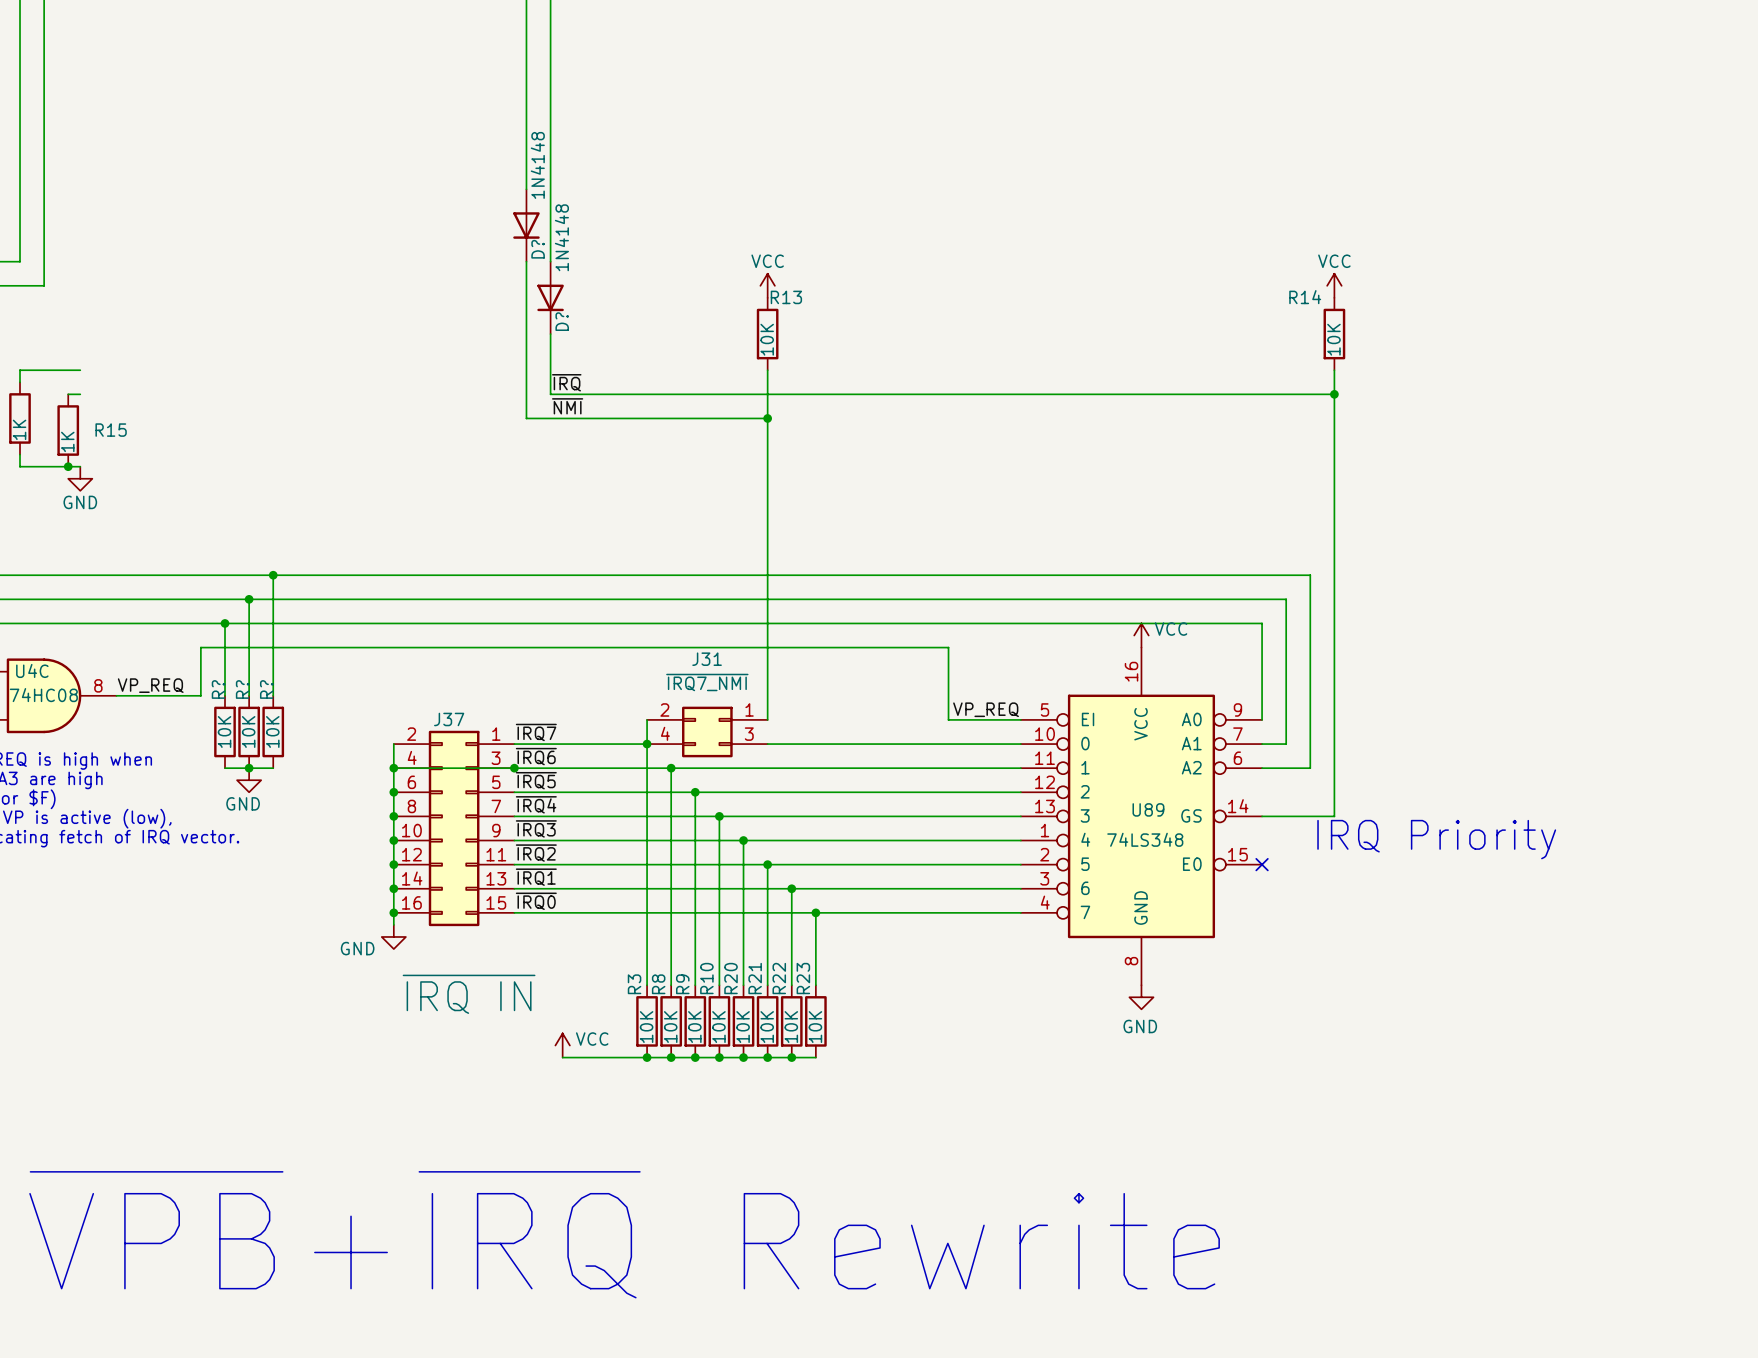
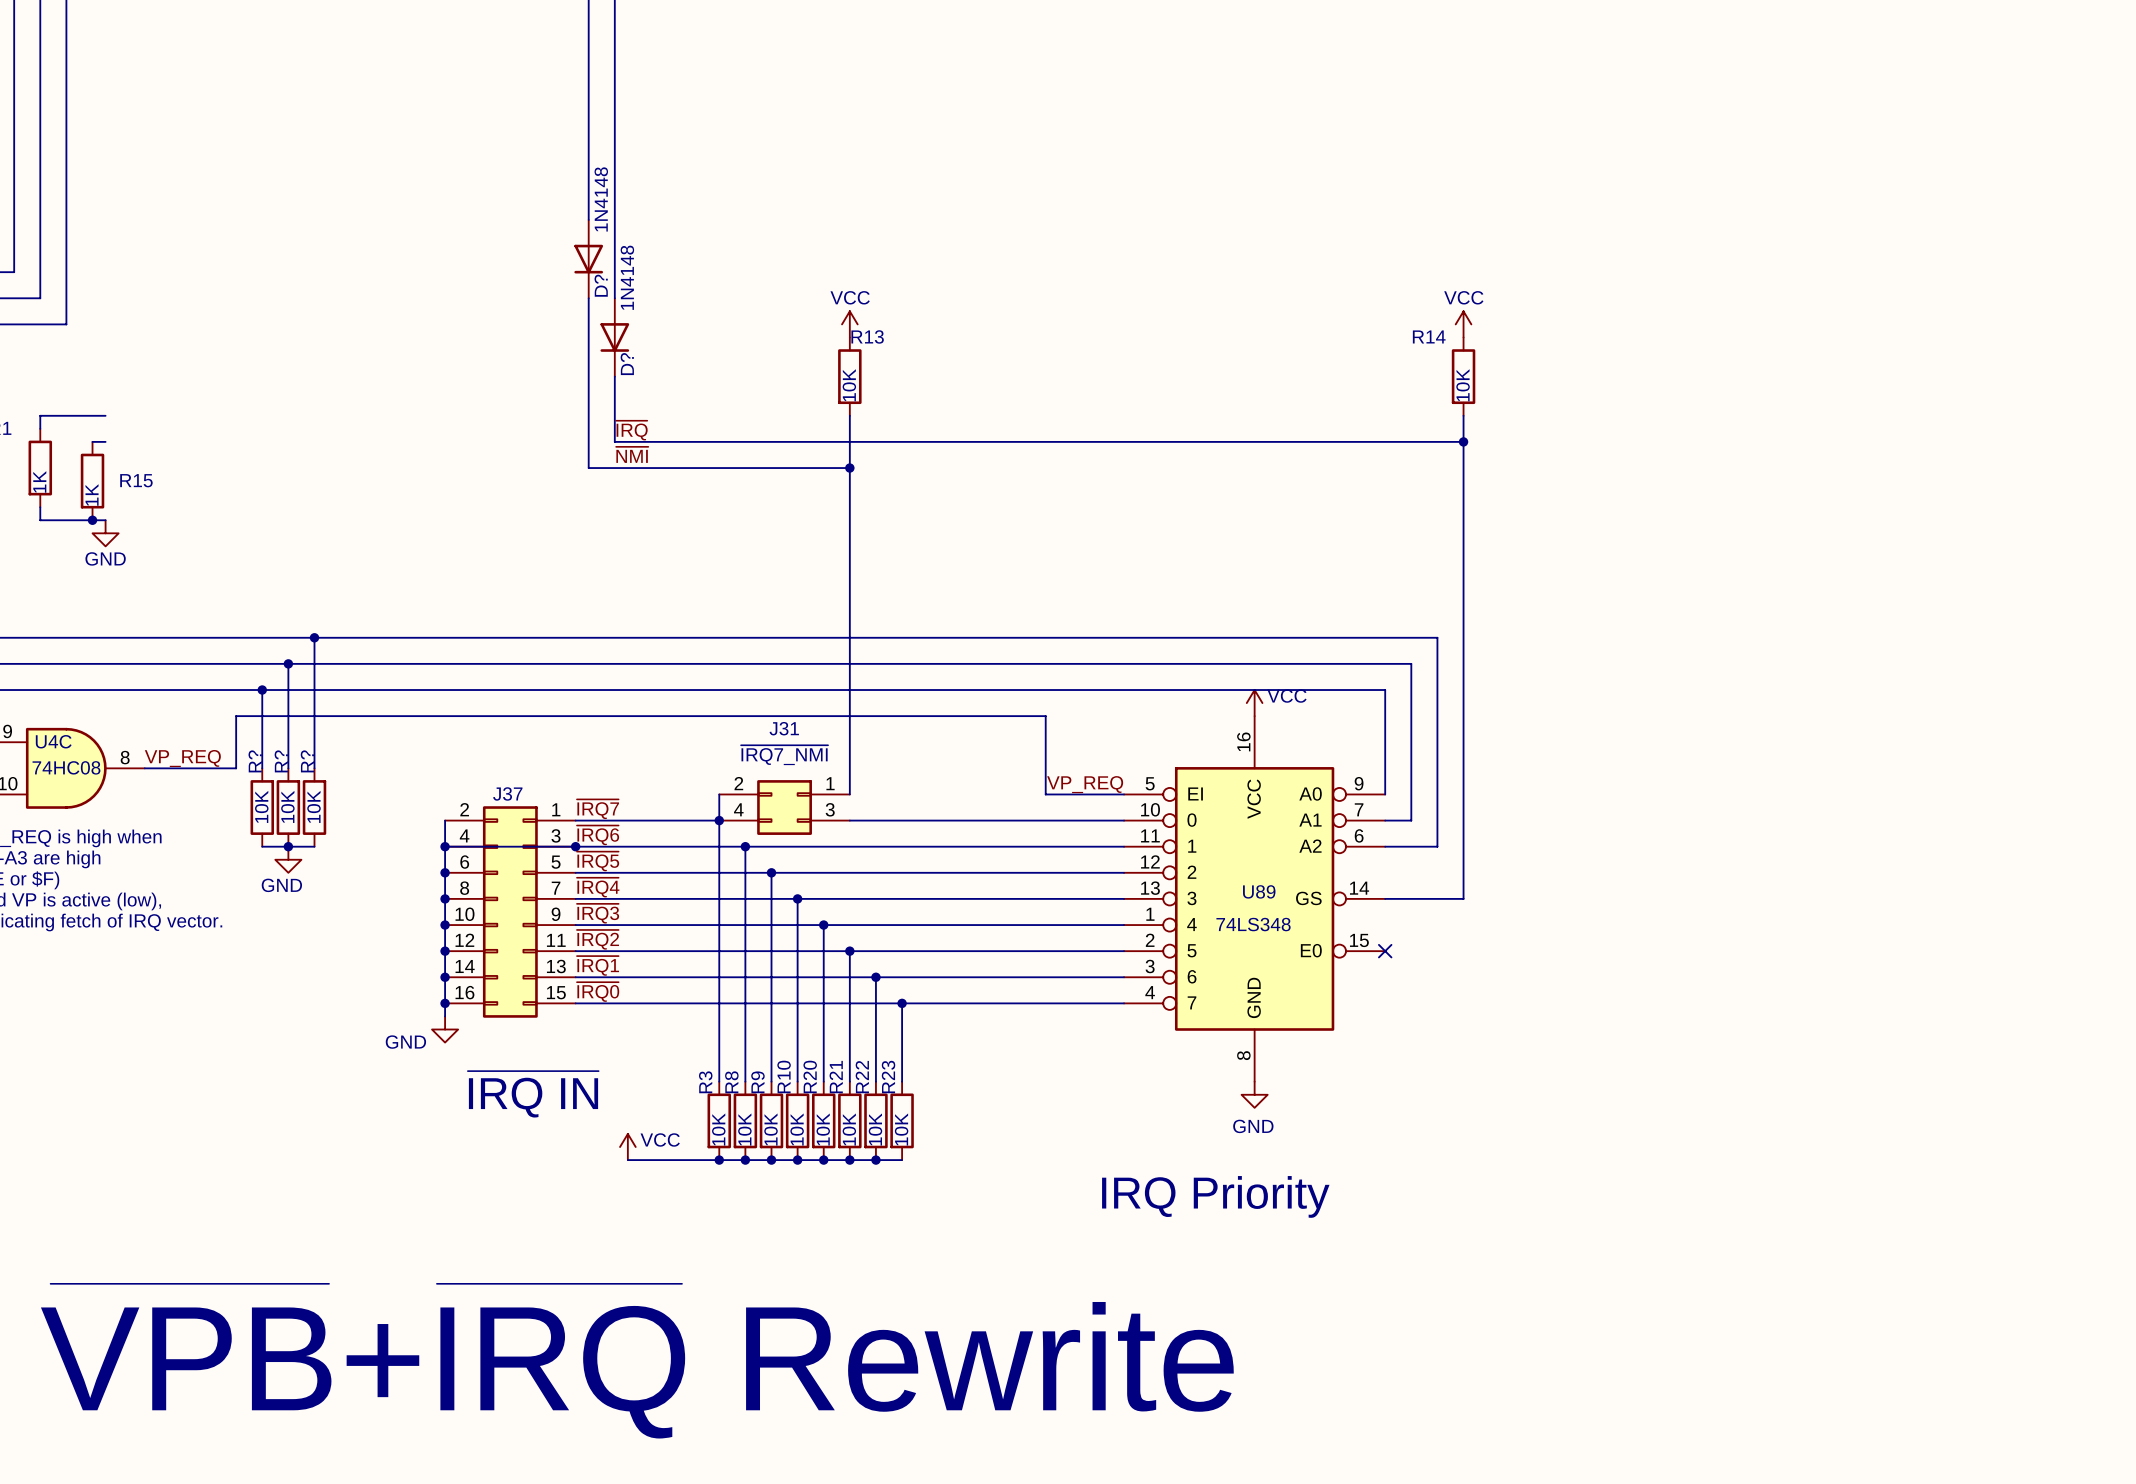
text: IRQ Priority (1436, 839) -> none
text: none -> IRQ Priority (1215, 1196)

